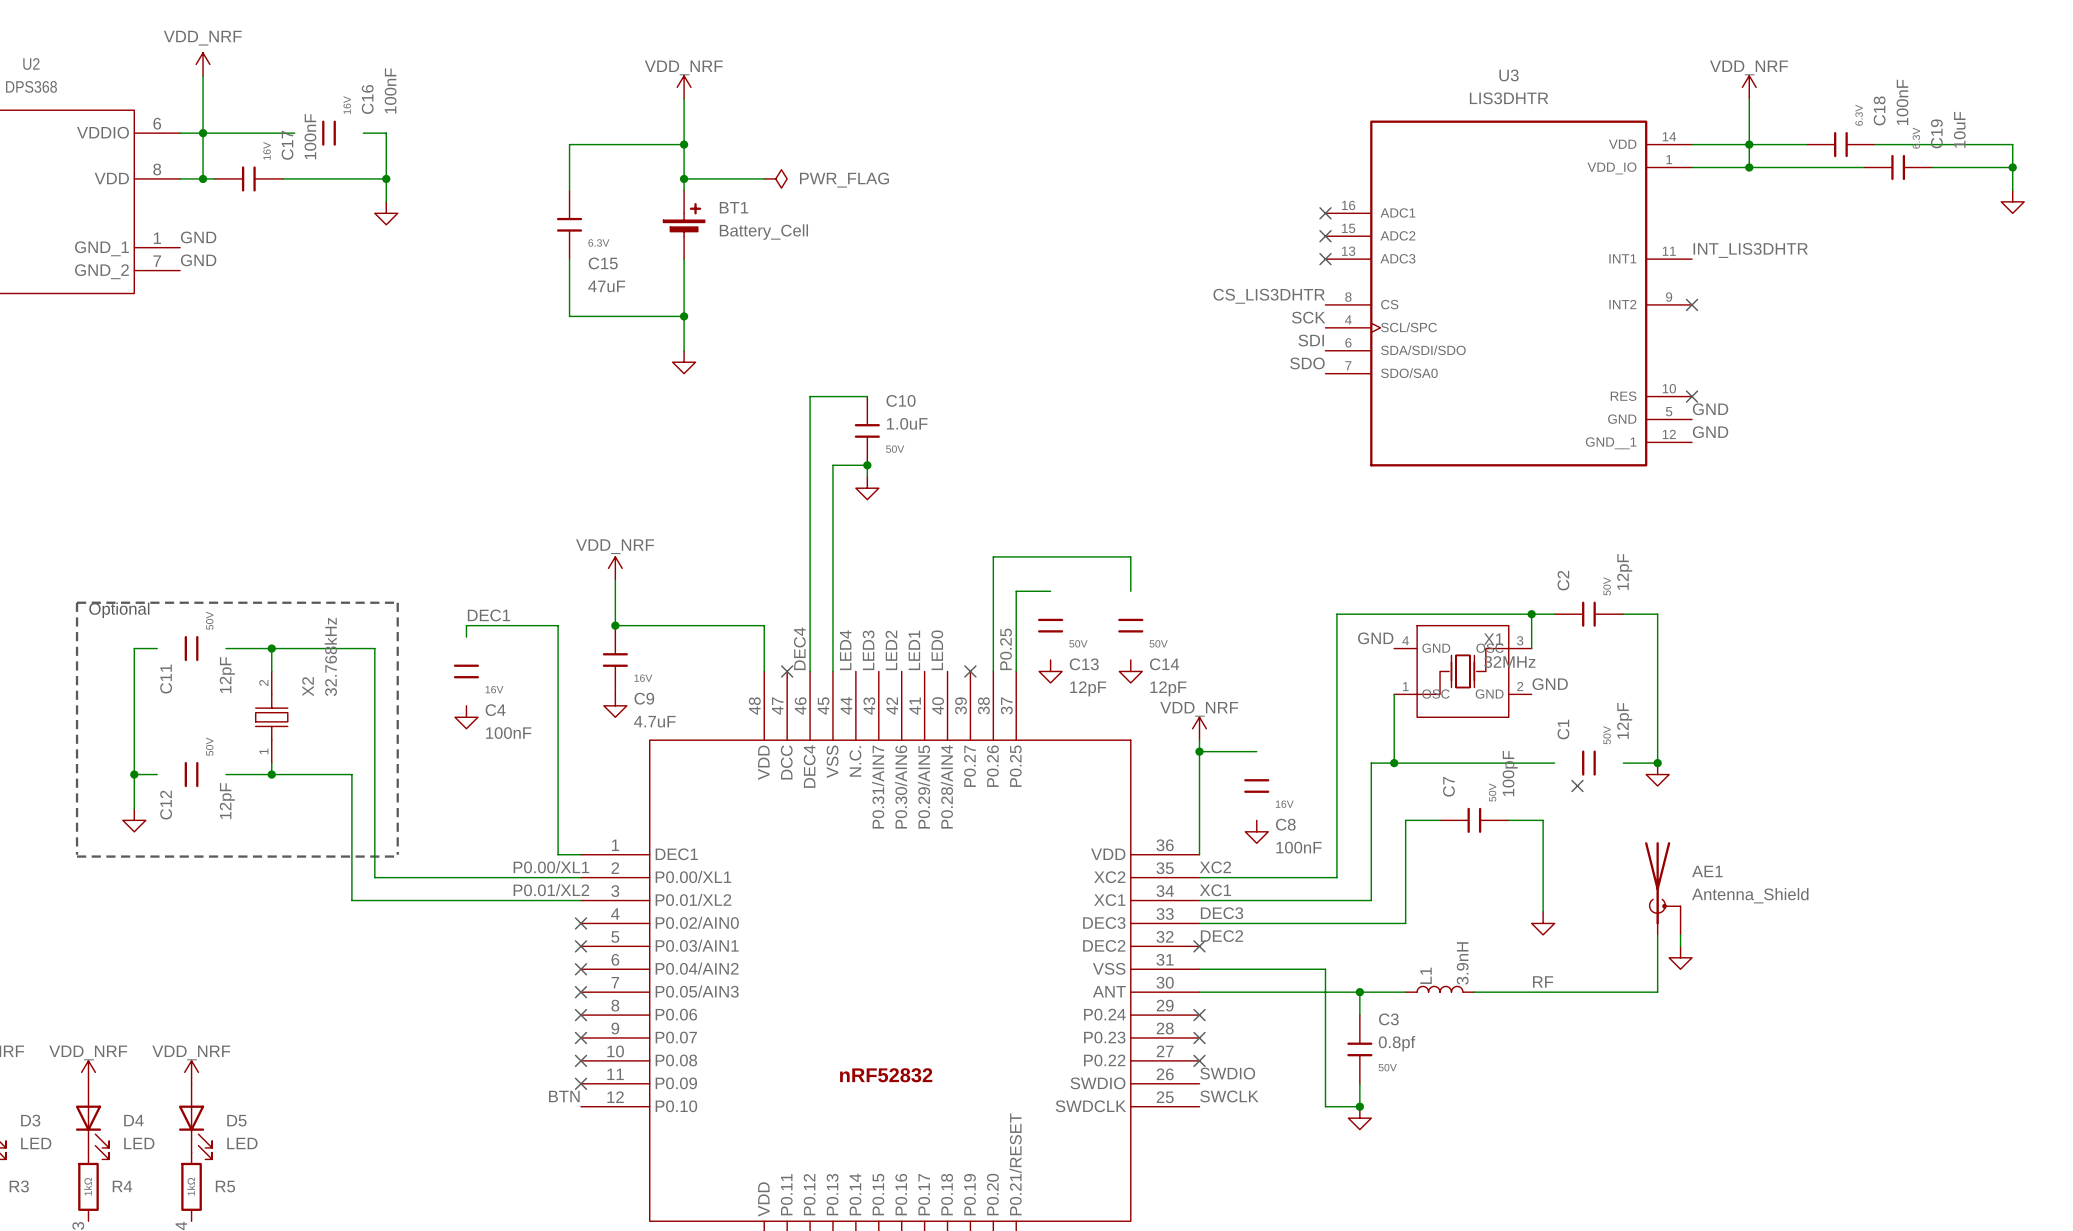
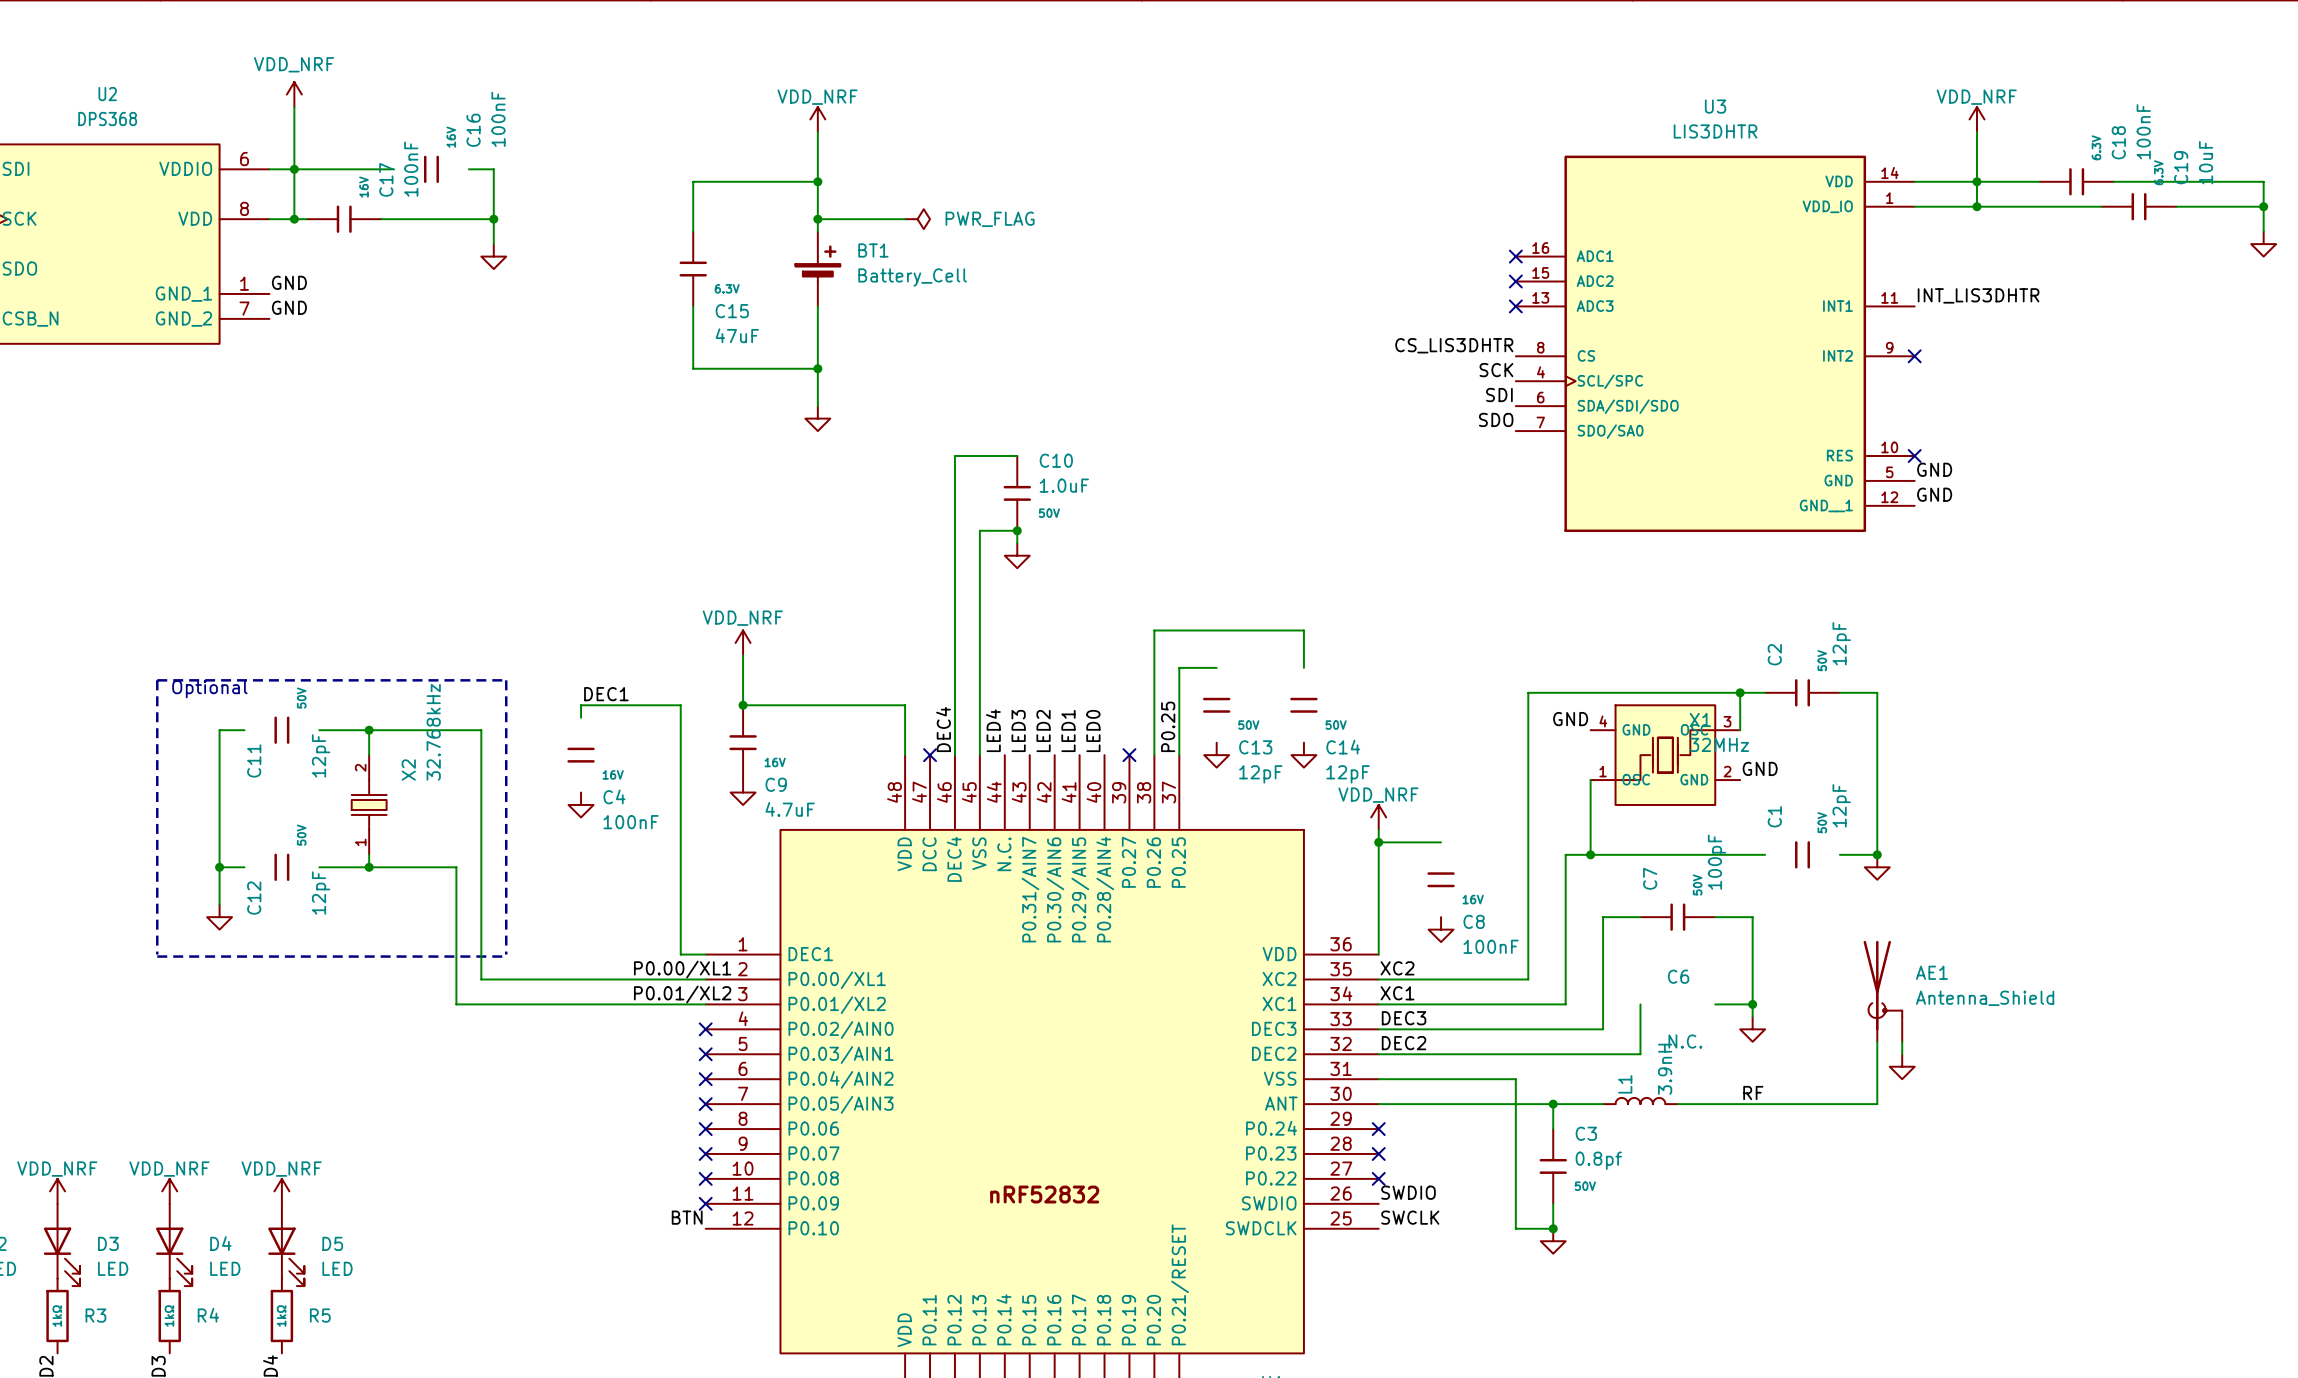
no-connect mark: (1577, 786) -> none
wire: none -> (1640, 1004) (1640, 1054) (1378, 1054)
wire: none -> (1715, 1004) (1752, 1004)
junction: none -> (1752, 1004)
C6: none -> N.C. (1685, 1009)
no-connect mark: (1199, 946) -> none

